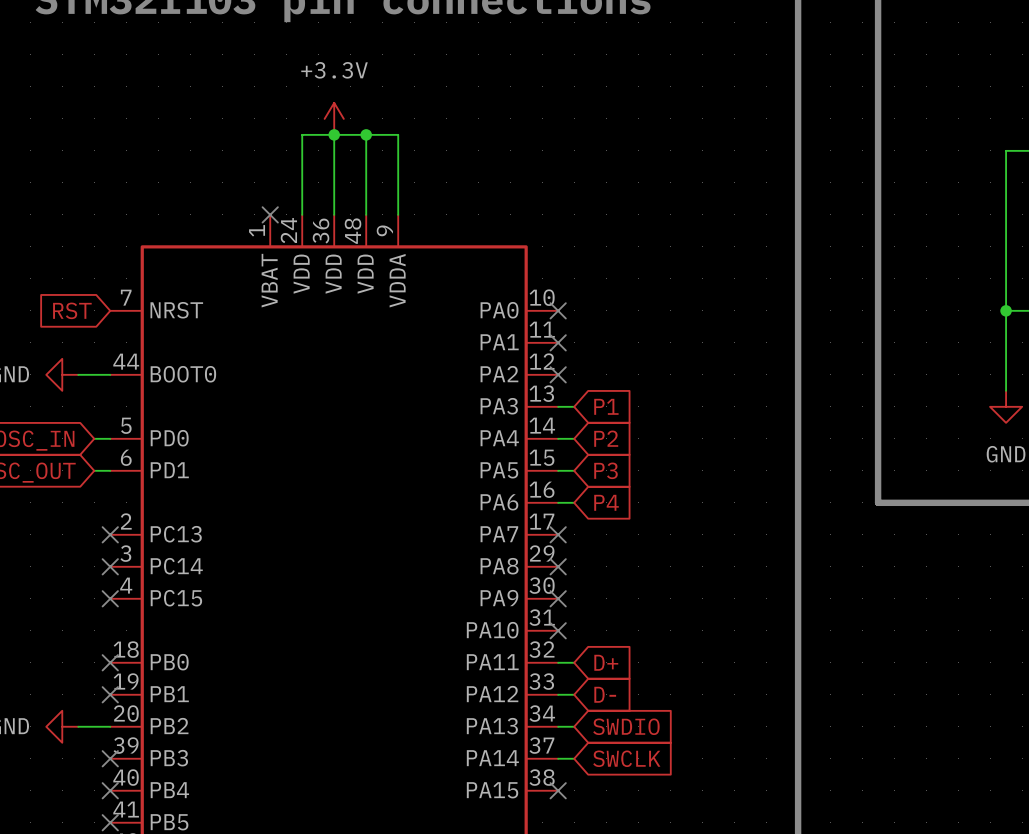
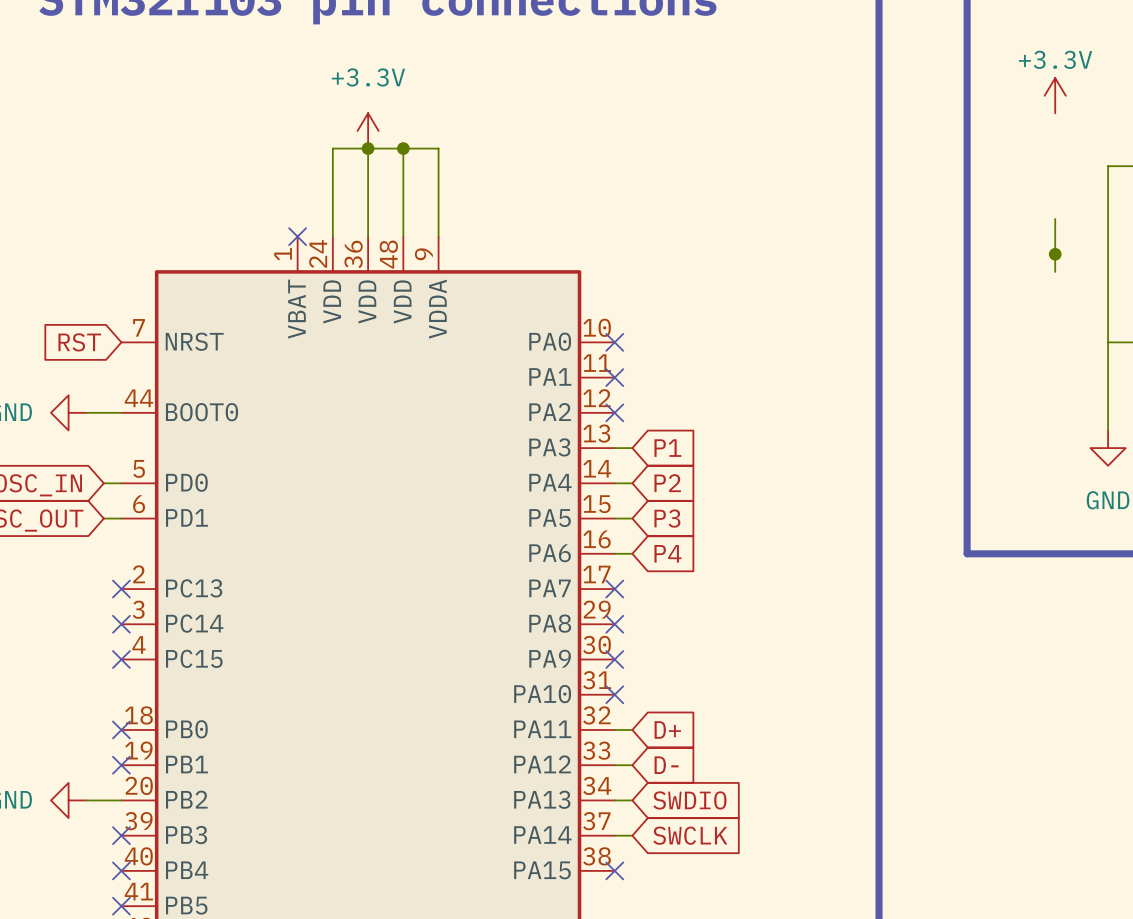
power symbol: none -> +3.3V (1055, 95)
wire: none -> (1055, 219) (1055, 271)
junction: none -> (1055, 254)
junction: (1006, 310) -> none

